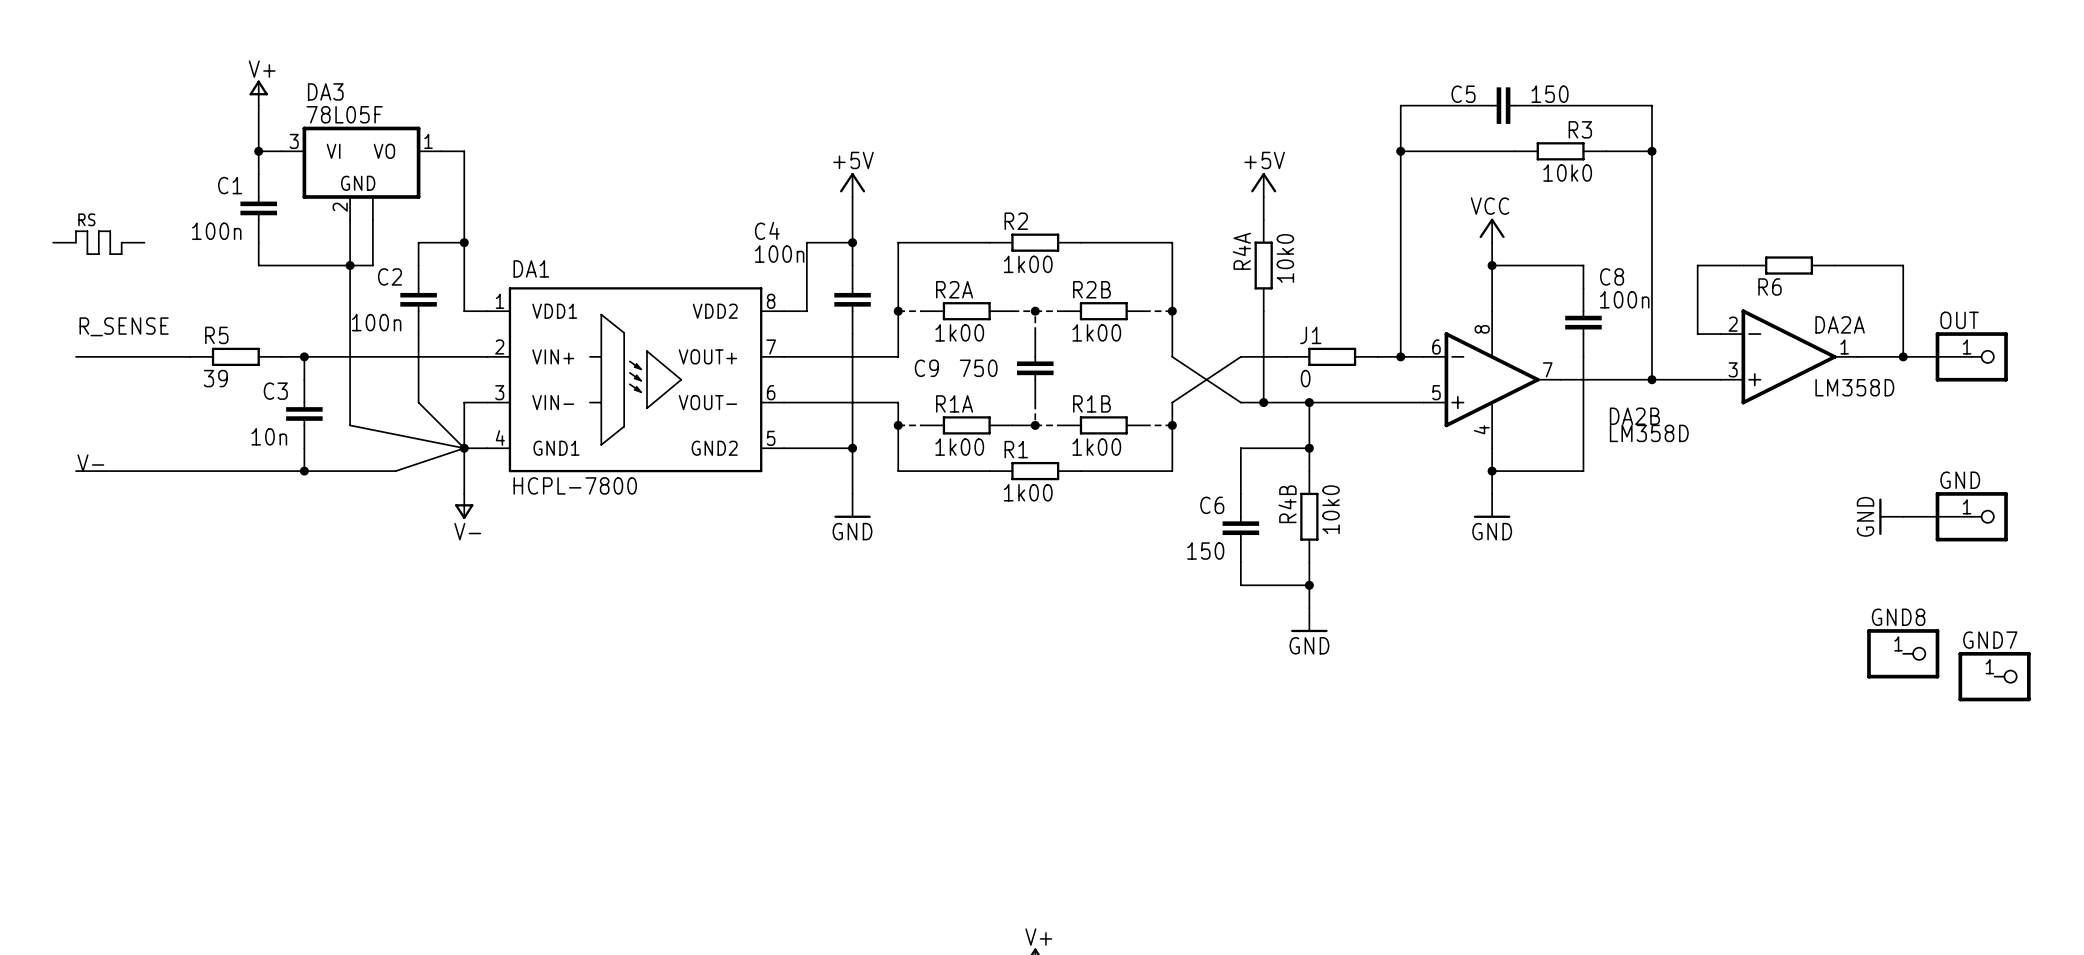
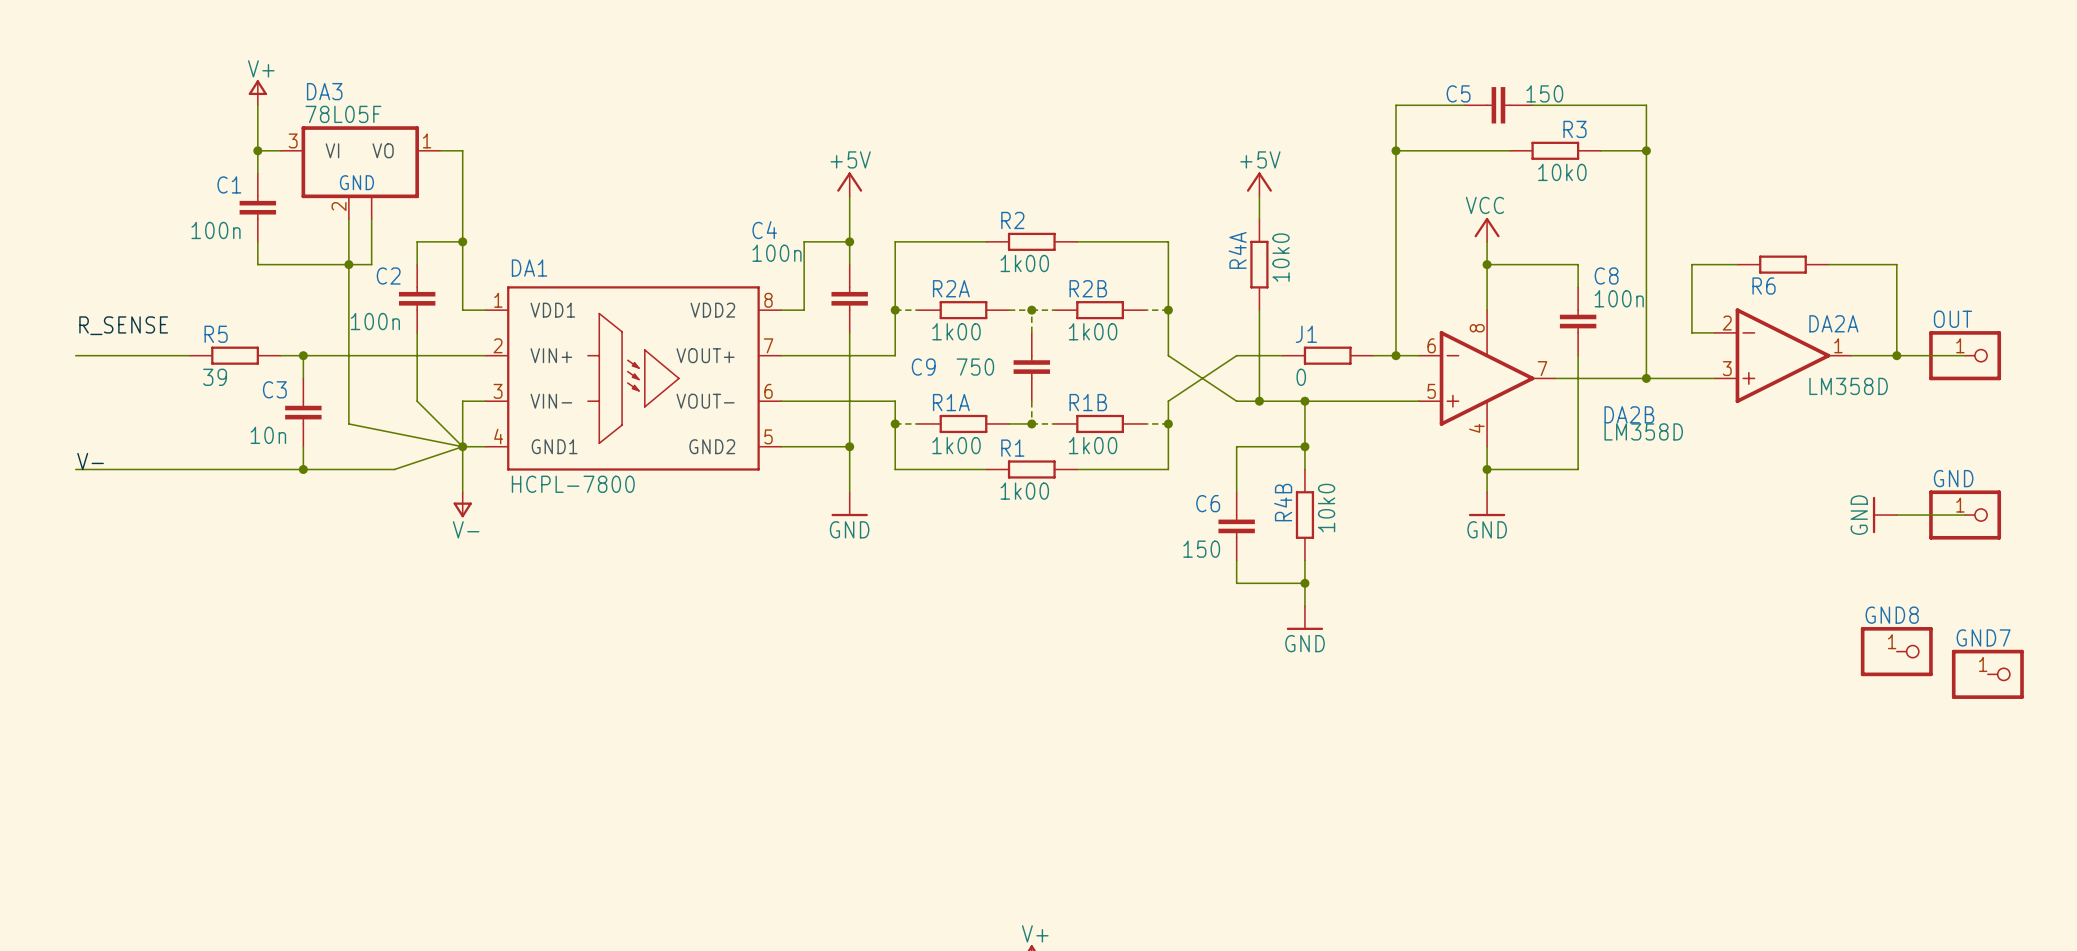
RS: (98, 242) -> none

